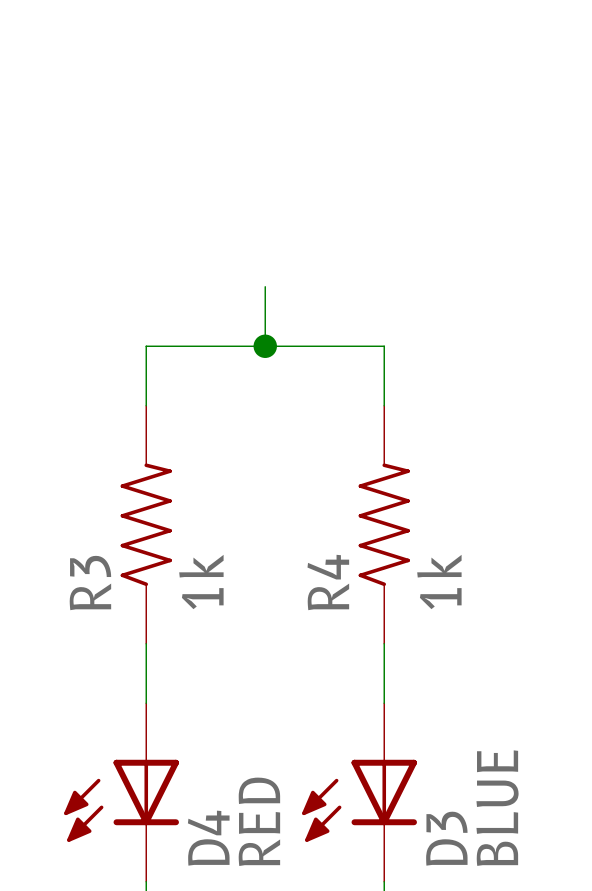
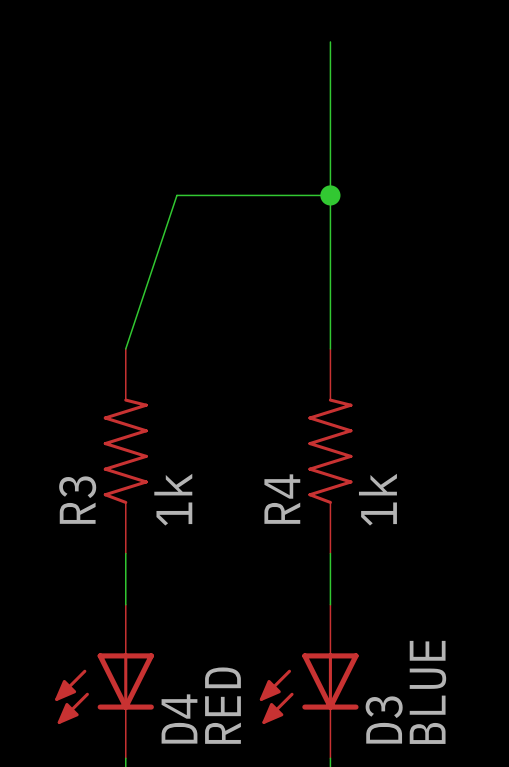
wire: none -> (330, 41) (330, 297)
junction: none -> (330, 195)
wire: (265, 286) (265, 346) -> none
junction: (265, 346) -> none
wire: (384, 346) (146, 346) (146, 405) -> (330, 195) (176, 195) (125, 348)

